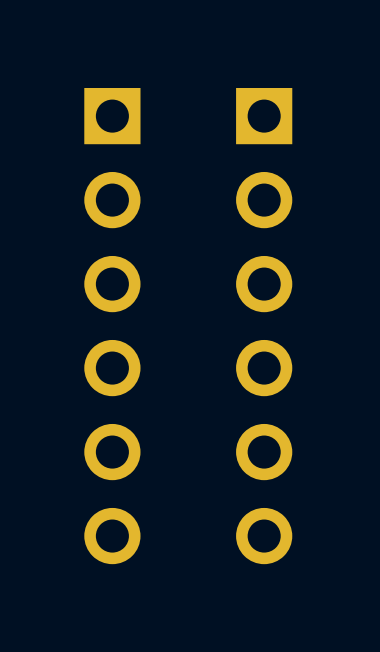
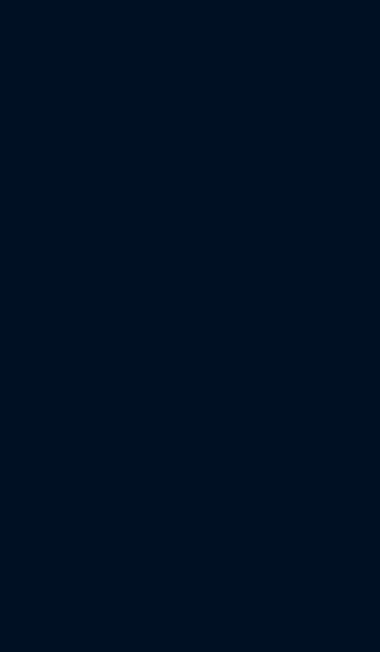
part: (112, 326) -> none
part: (264, 326) -> none

